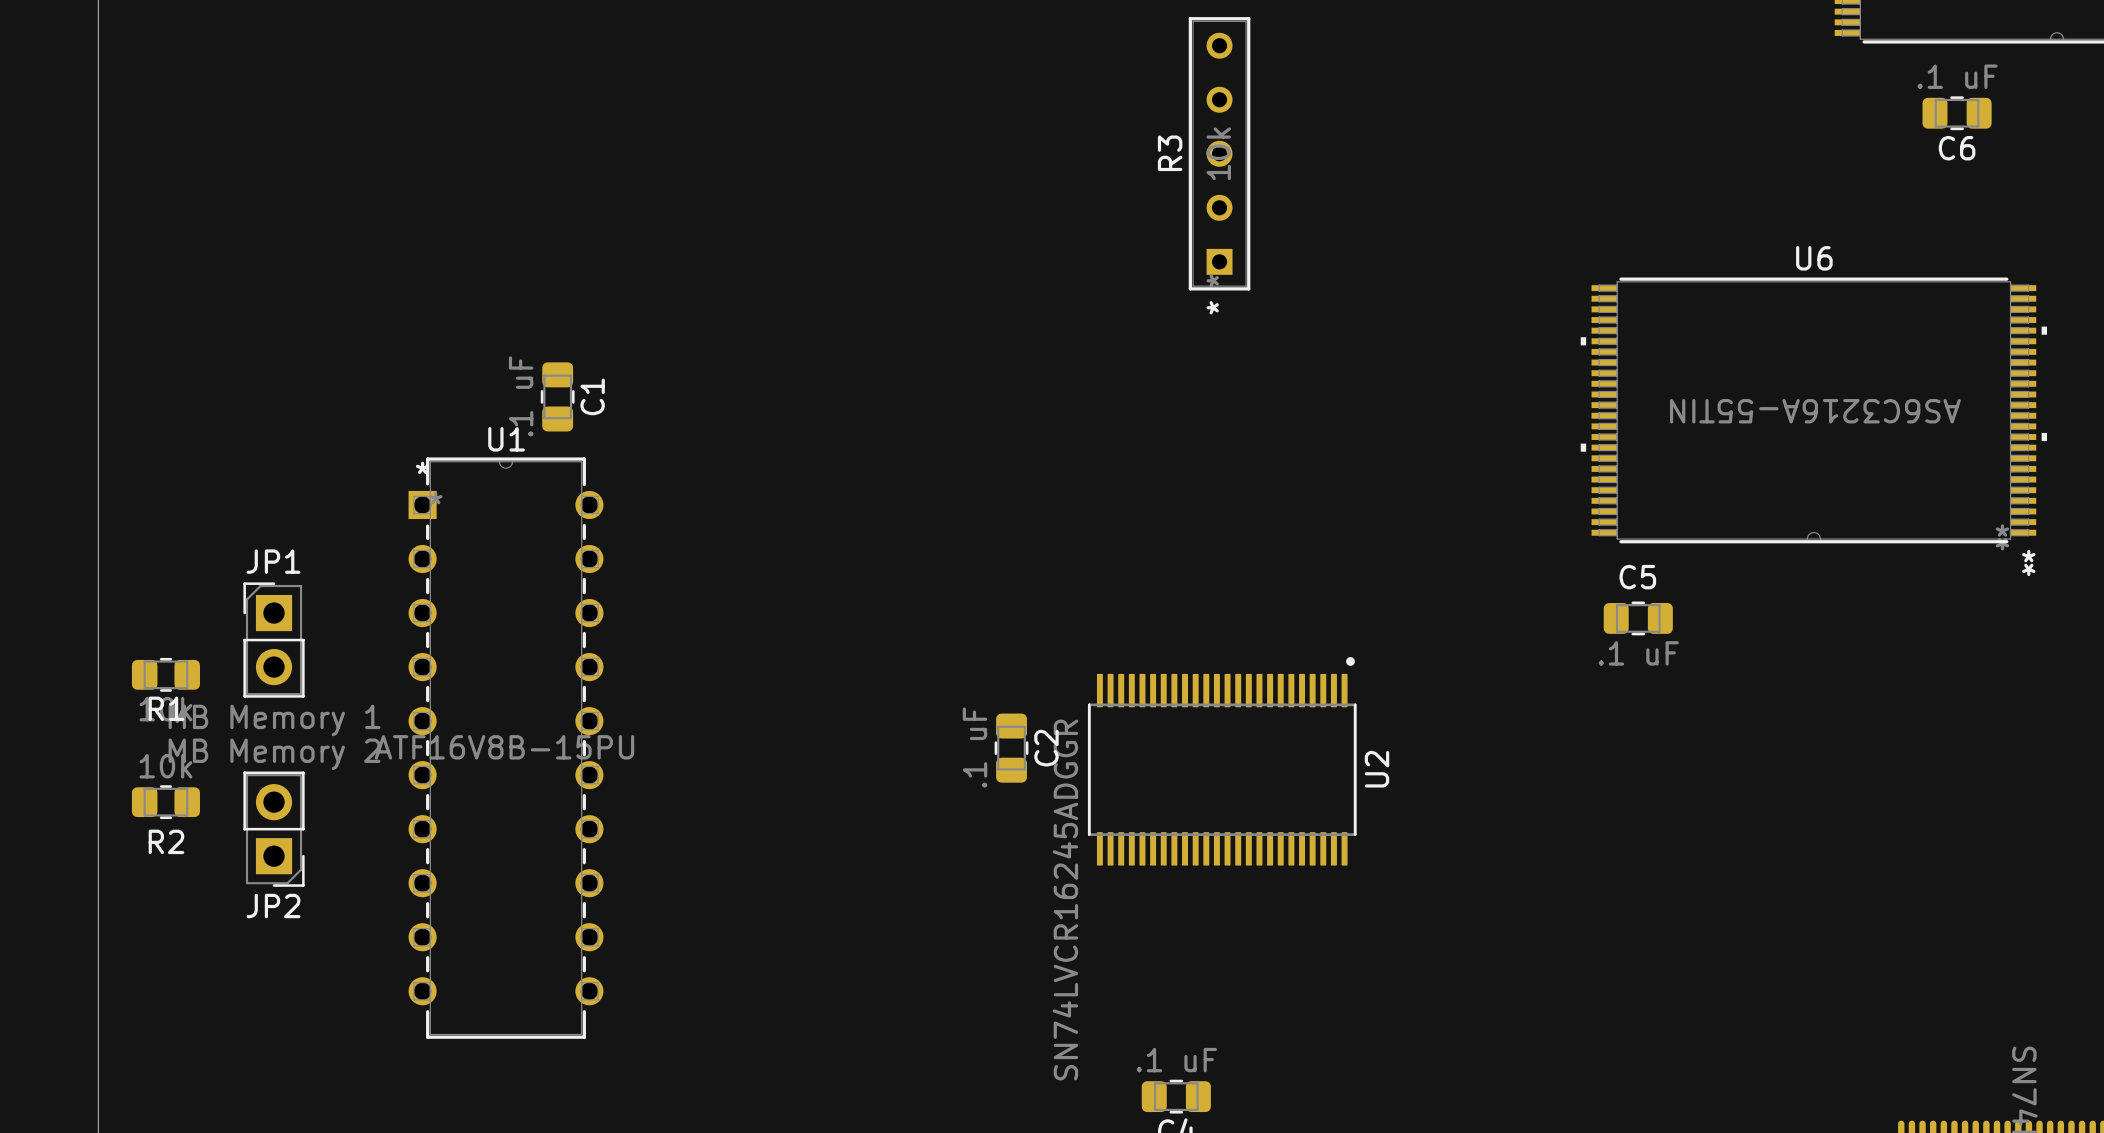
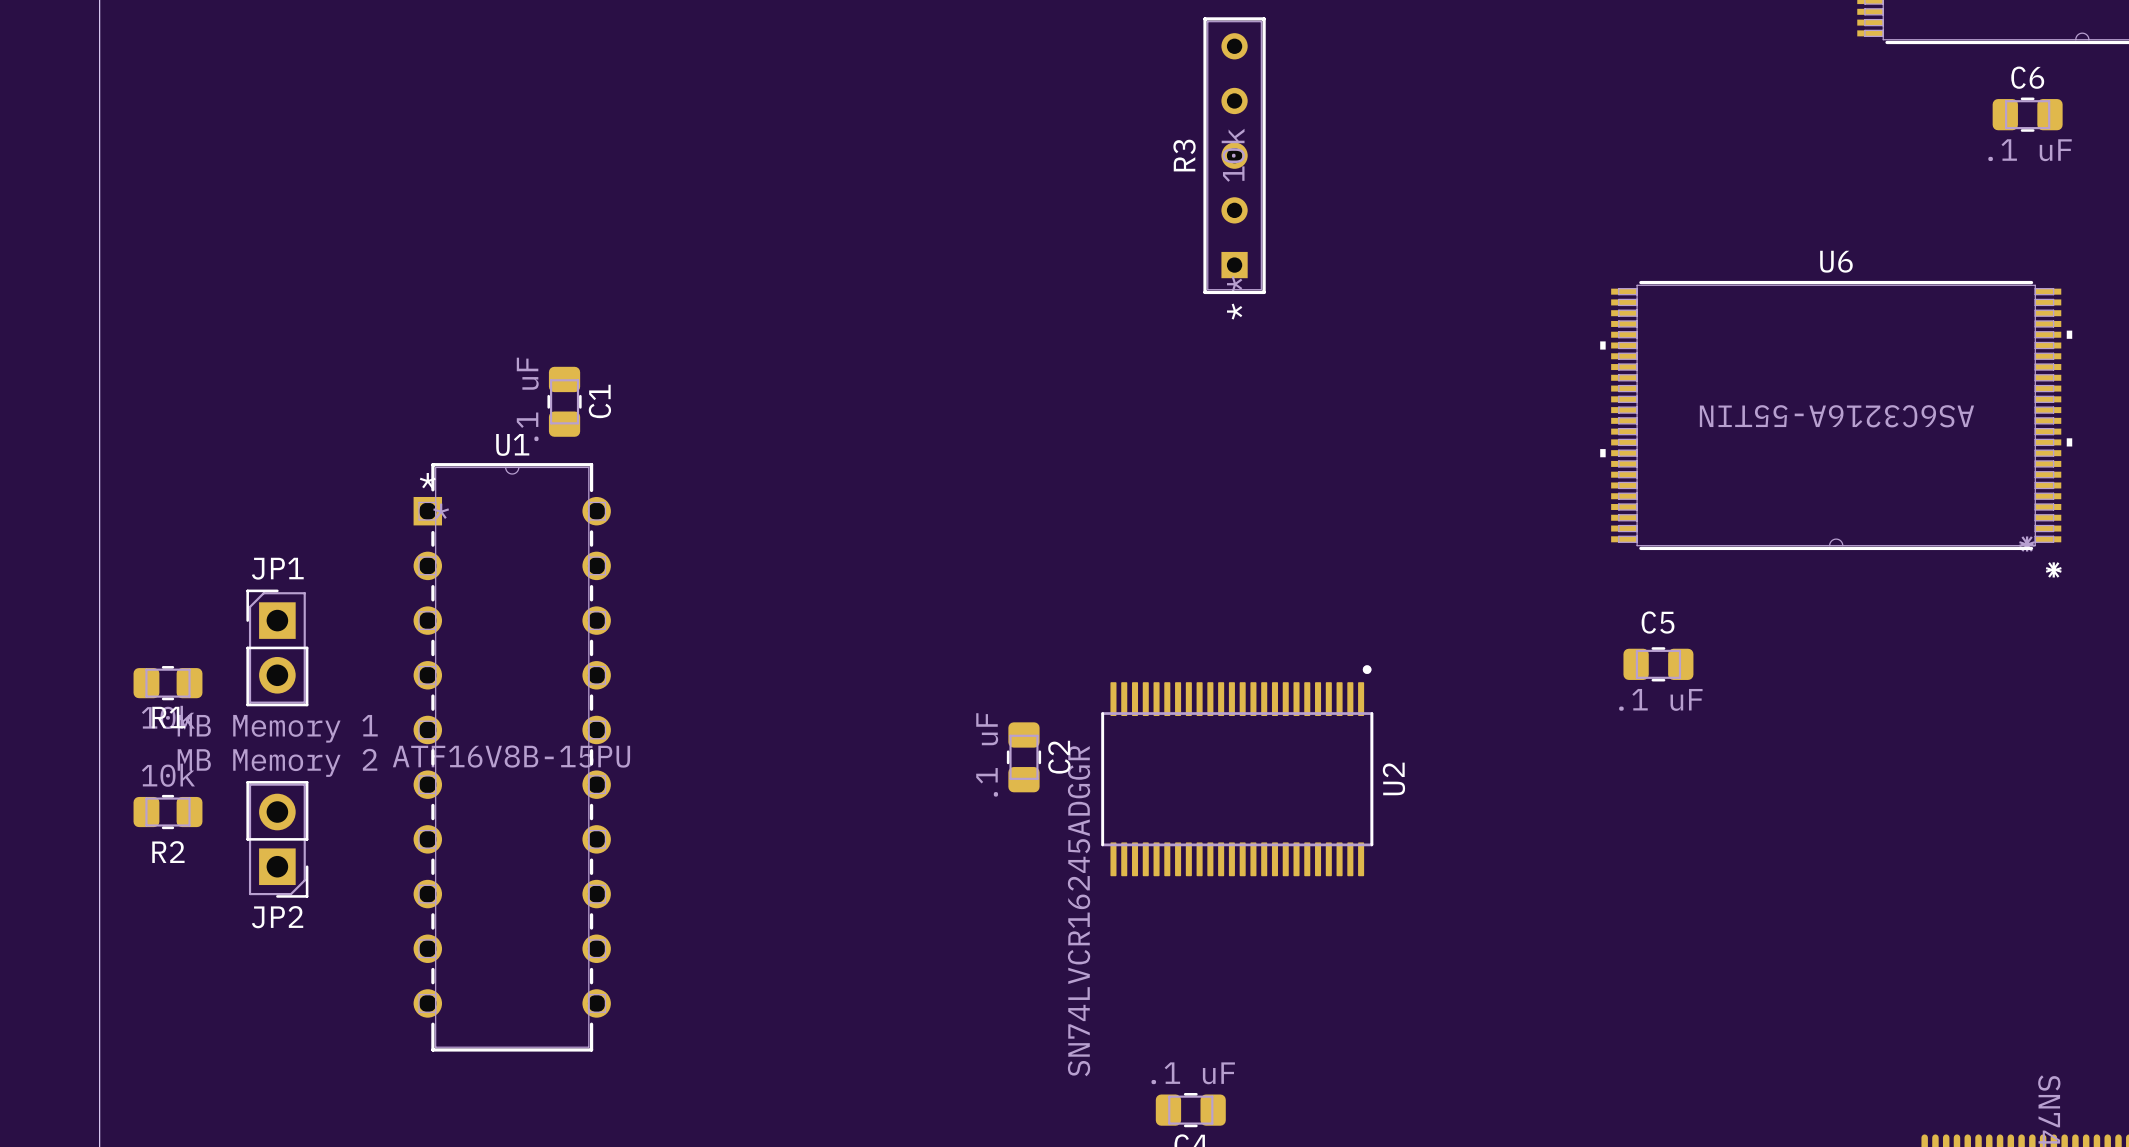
C6 value position: .1 uF (1957, 76) -> .1 uF (2030, 150)
C6 position: (1957, 113) -> (2027, 114)
C6 name position: C6 (1957, 148) -> C6 (2027, 77)
C5 position: (1638, 618) -> (1658, 664)

